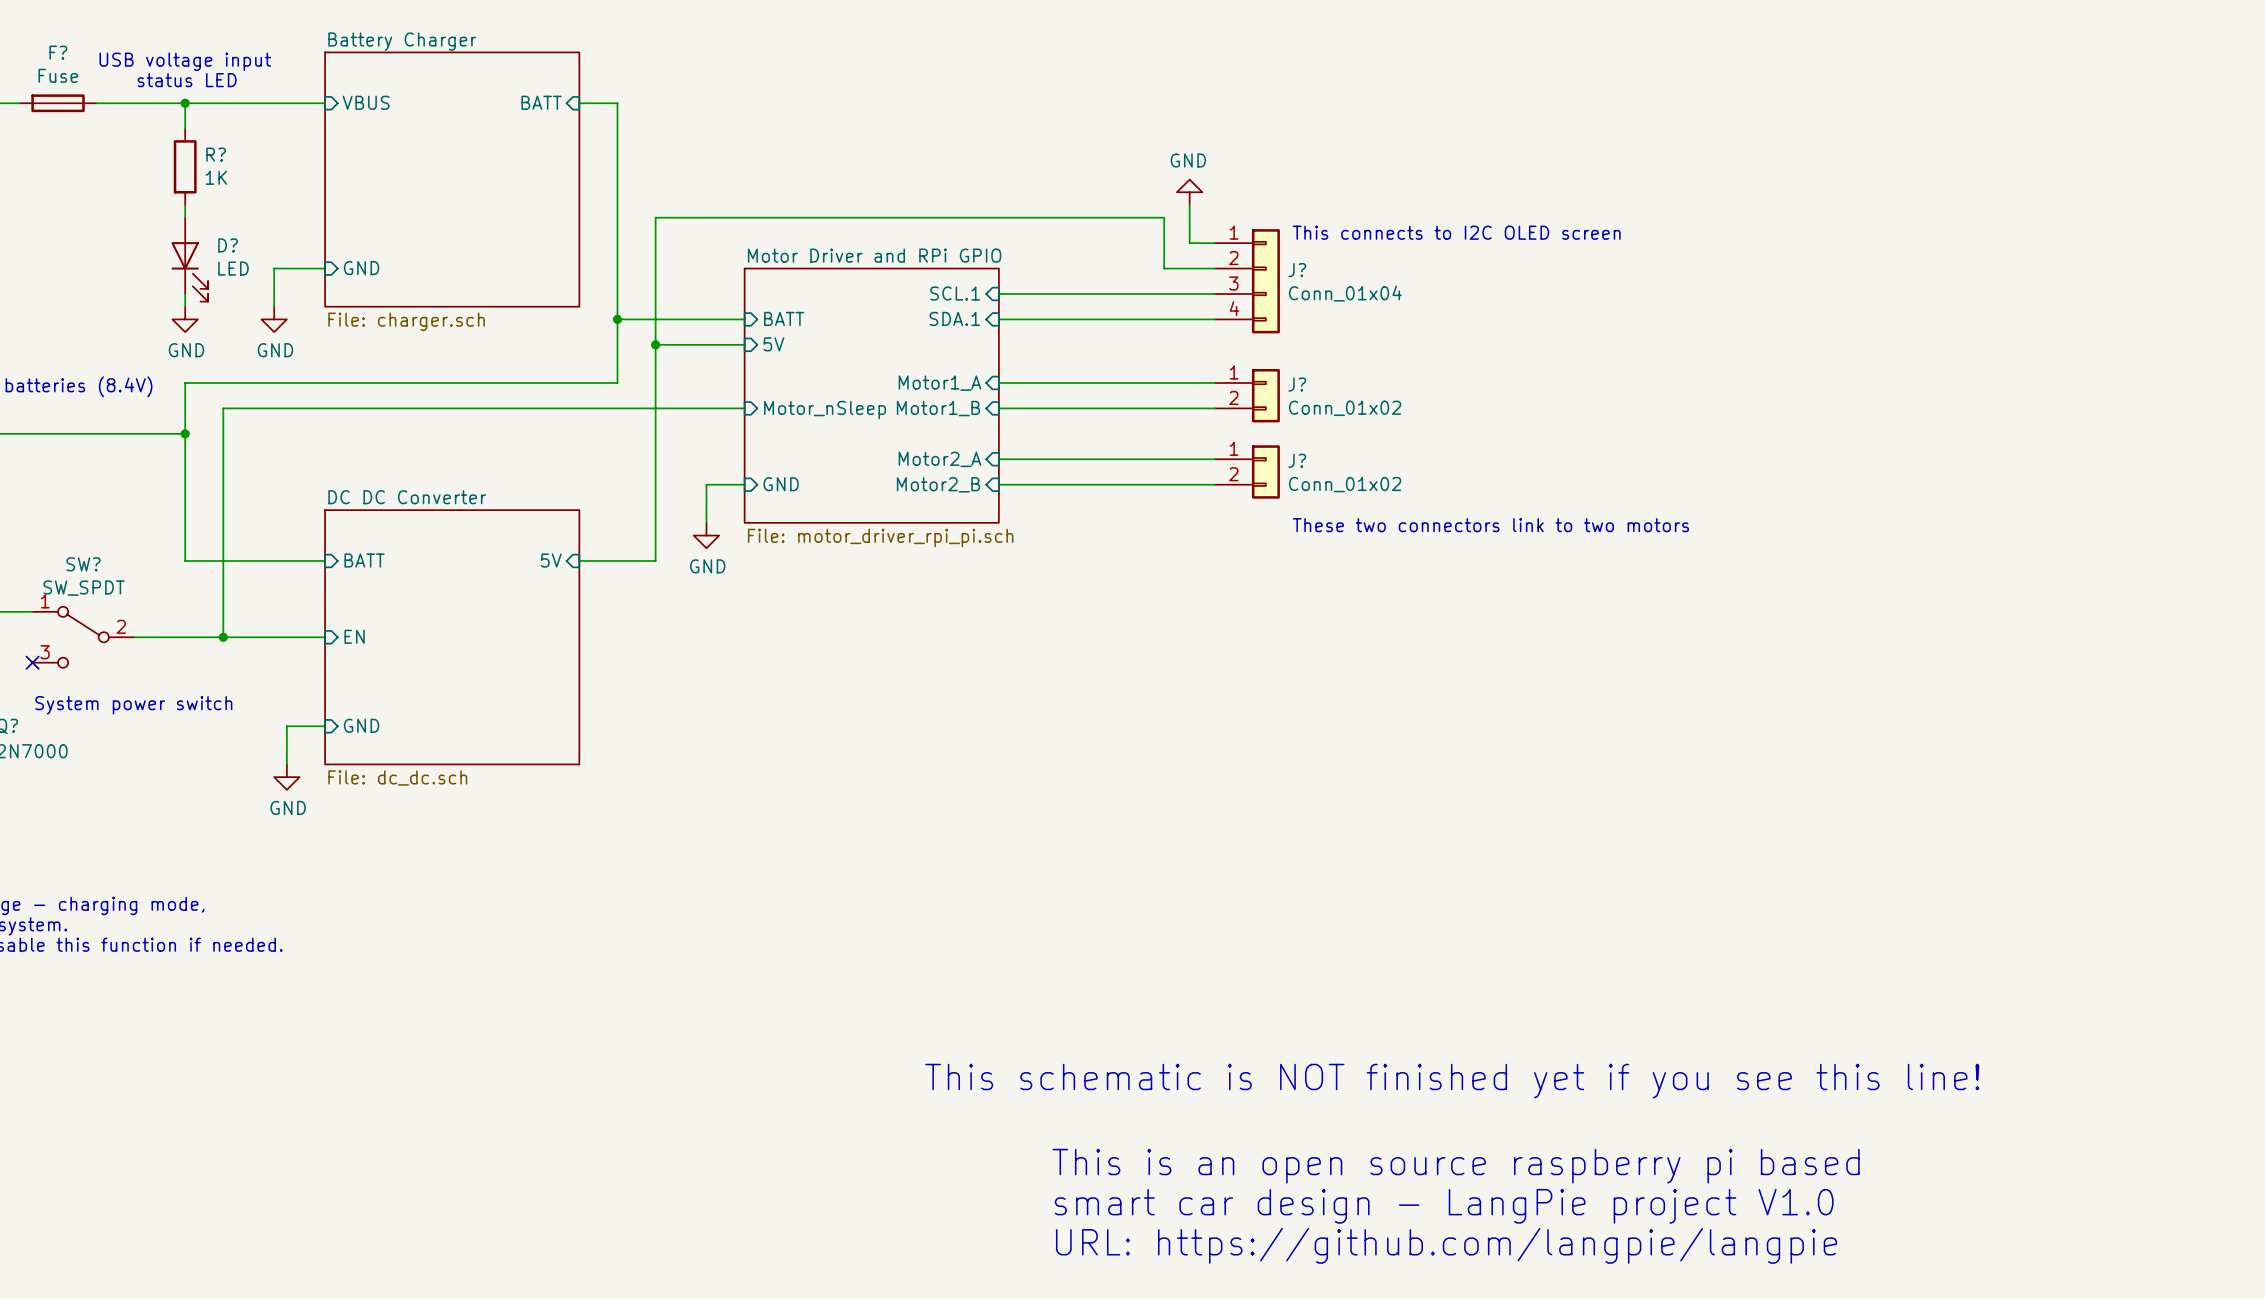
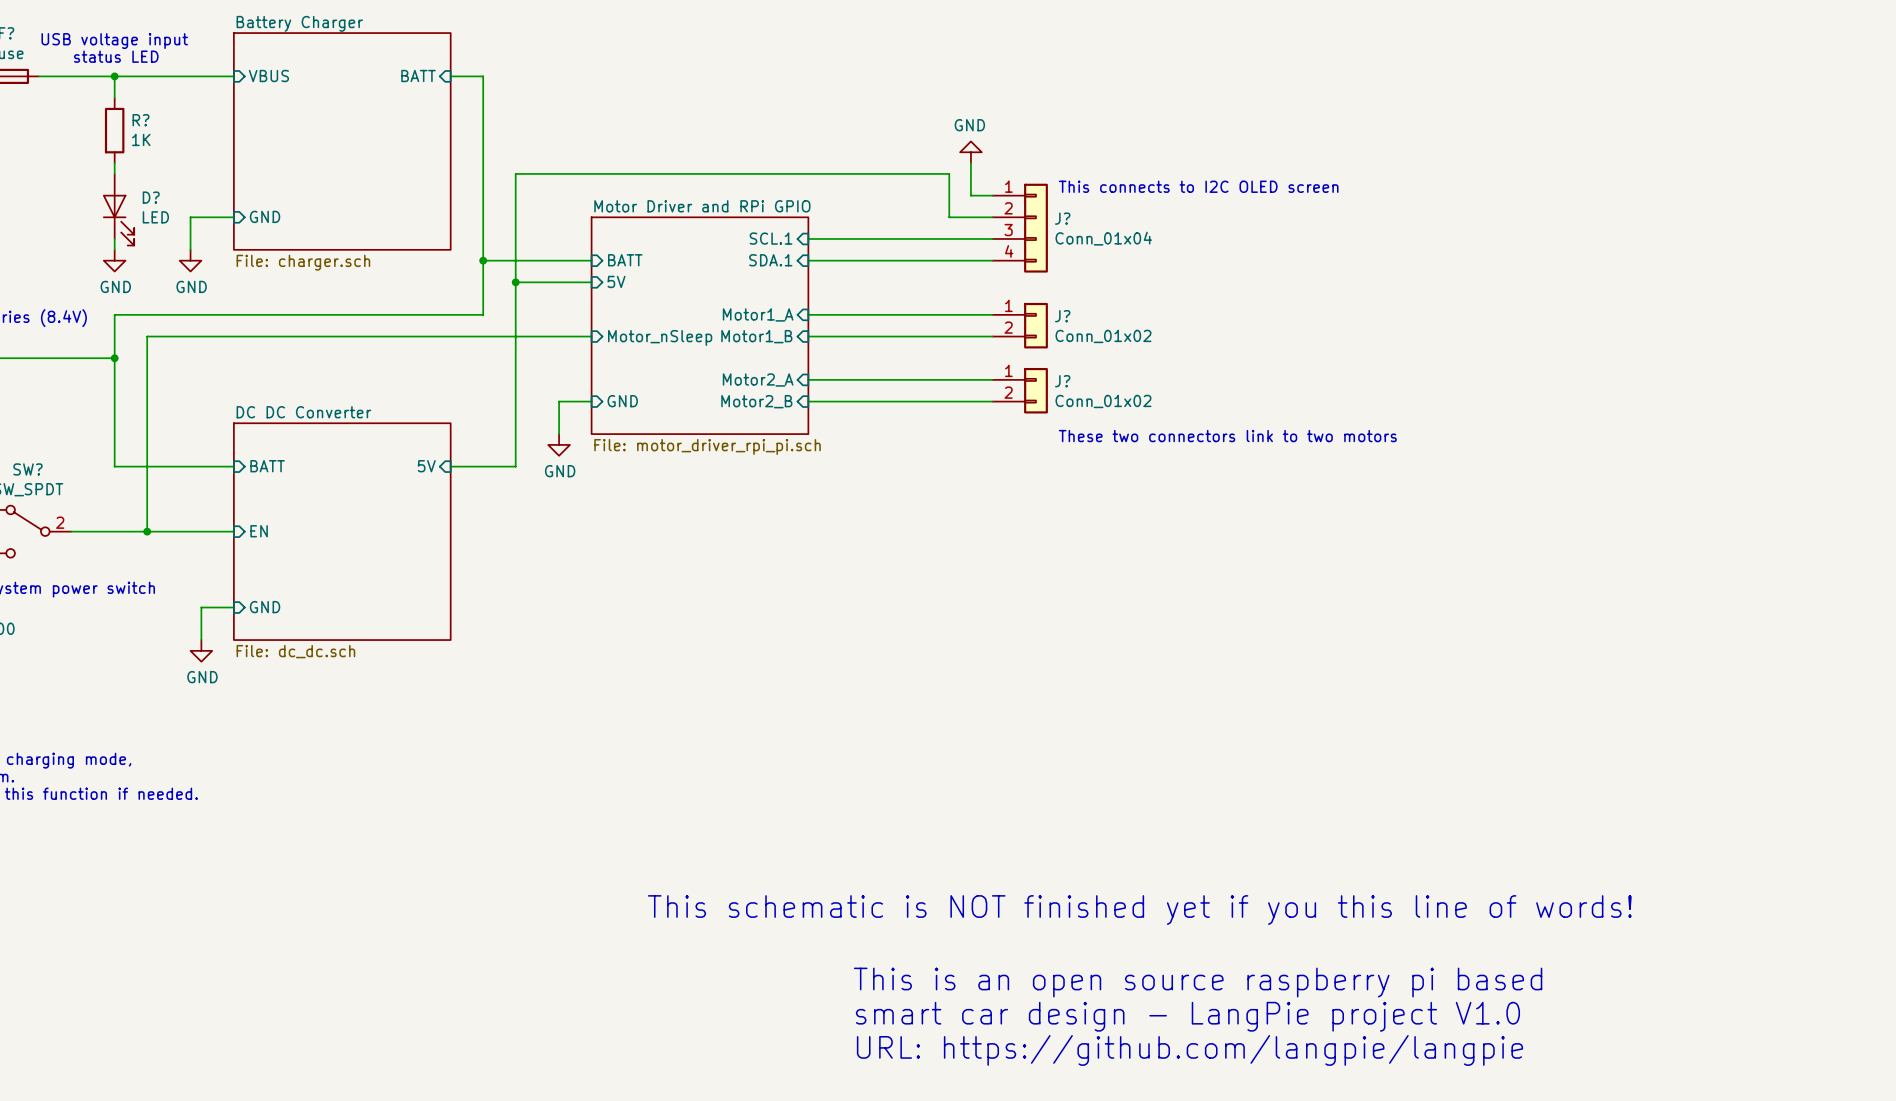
text: This schematic is NOT finished yet if you see this line! (1452, 1081) -> This schematic is NOT finished yet if you this line of words! (1139, 910)

